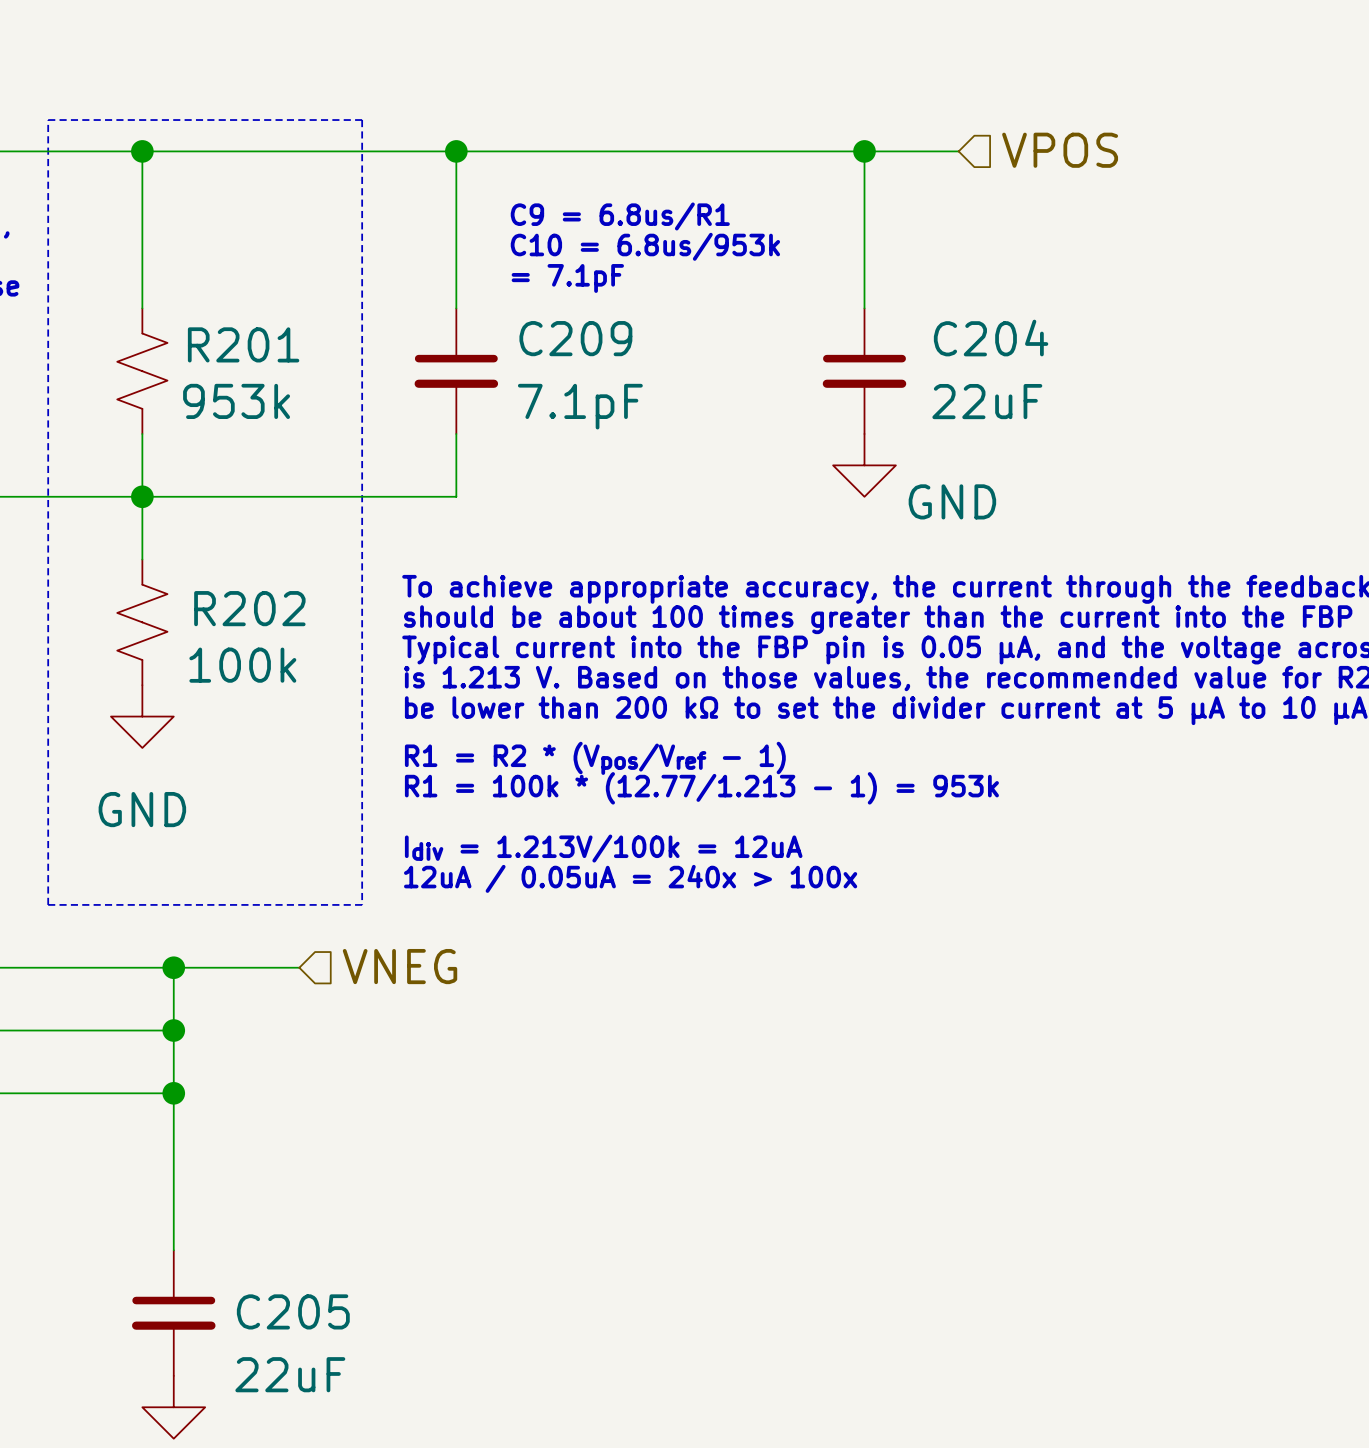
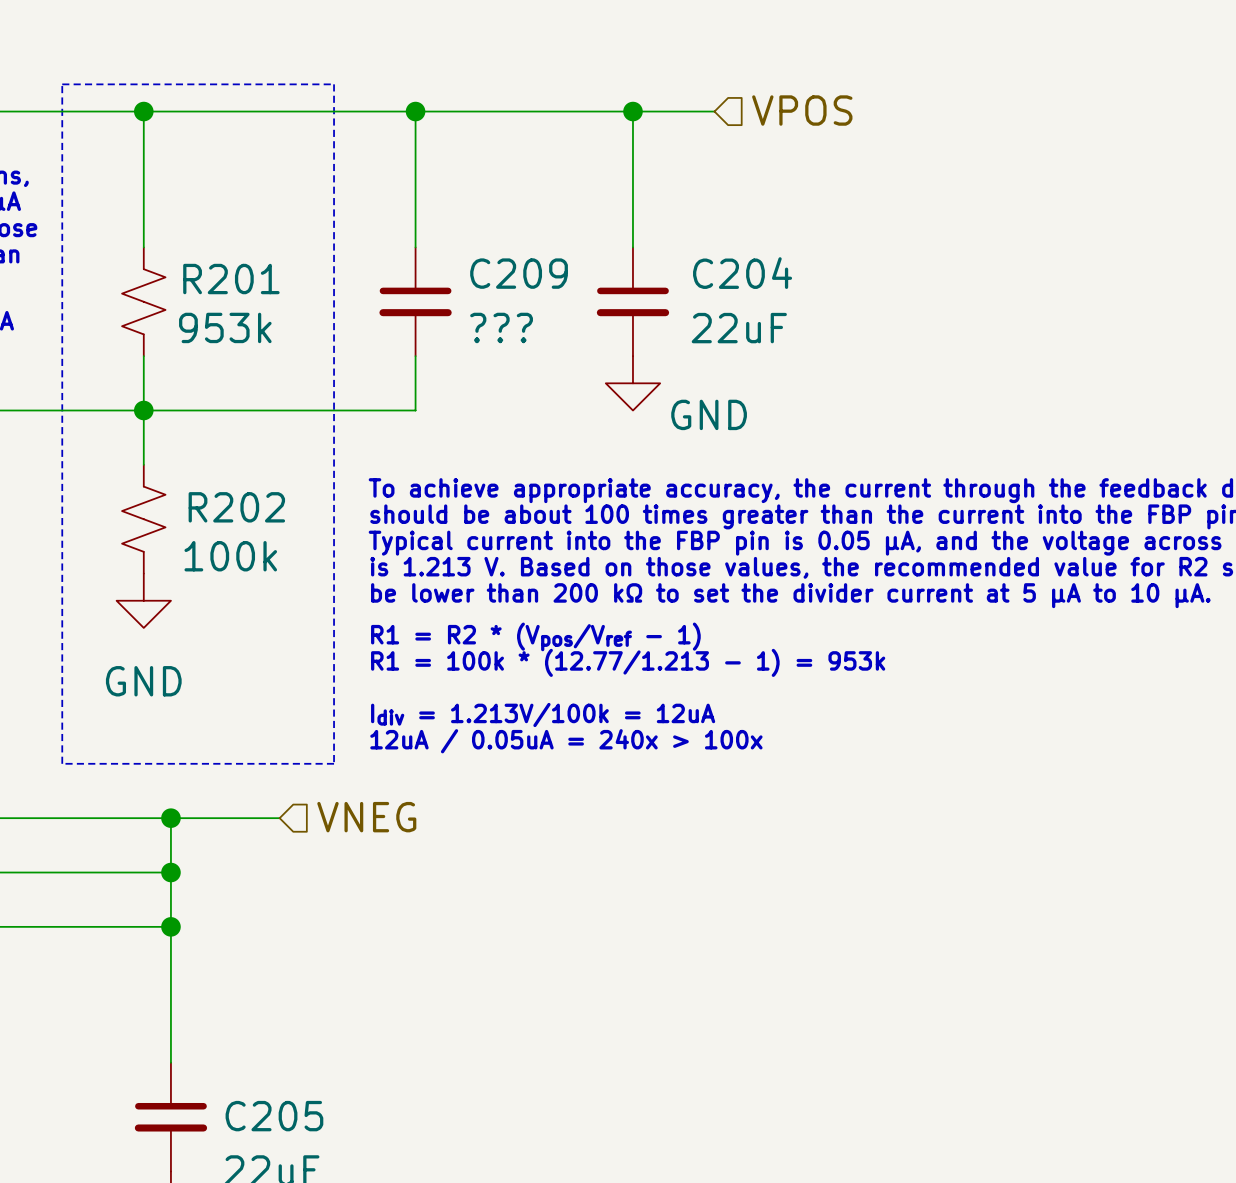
hierarchical label position: VPOS (1060, 150) -> VPOS (802, 110)
junction: none -> (632, 111)
wire: (801, 151) (958, 151) -> none
wire: (864, 151) (864, 308) -> (632, 111) (632, 247)
junction: (864, 151) -> none
text: C9 = 6.8us/R1 (620, 216) -> none
text: C10 = 6.8us/953k (645, 246) -> none
text: = 7.1pF (567, 278) -> none
C204 position: (864, 371) -> (632, 301)
C209 value: 7.1pF (580, 406) -> ??? (501, 327)
power symbol position: GND (864, 465) -> GND (632, 383)

